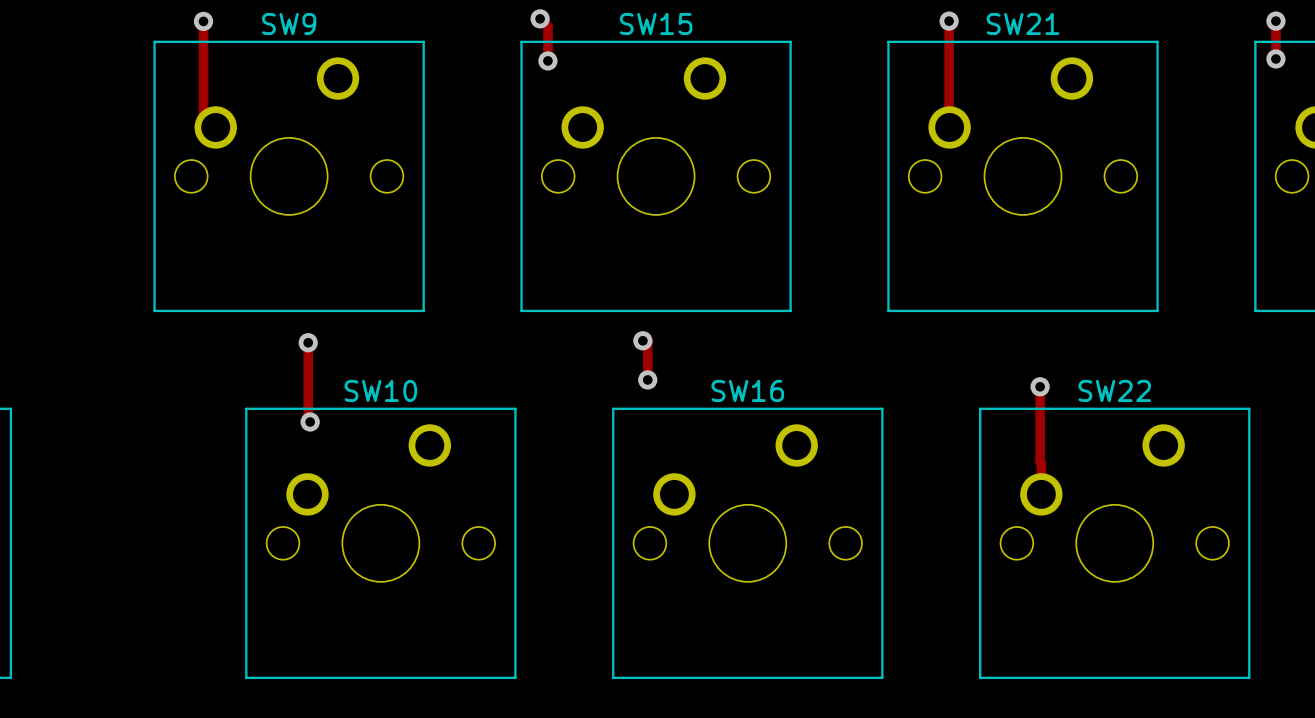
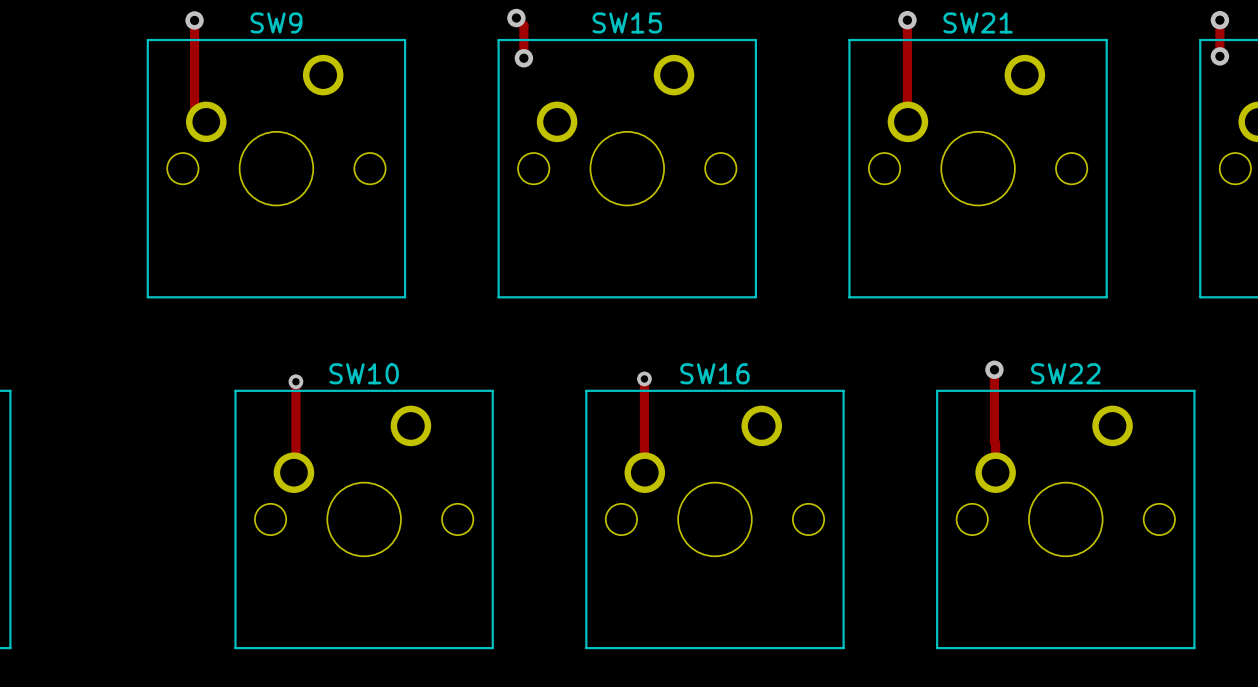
track: (642, 340) (647, 341) (647, 379) -> none
via: (642, 340) -> none
track: (308, 342) (308, 420) (310, 421) -> none
via: (308, 342) -> none
via: (647, 379) -> none
track: none -> (644, 378) (644, 472)
via: none -> (644, 378)
track: none -> (295, 381) (295, 470) (293, 472)
via: none -> (295, 381)
via: (310, 421) -> none

